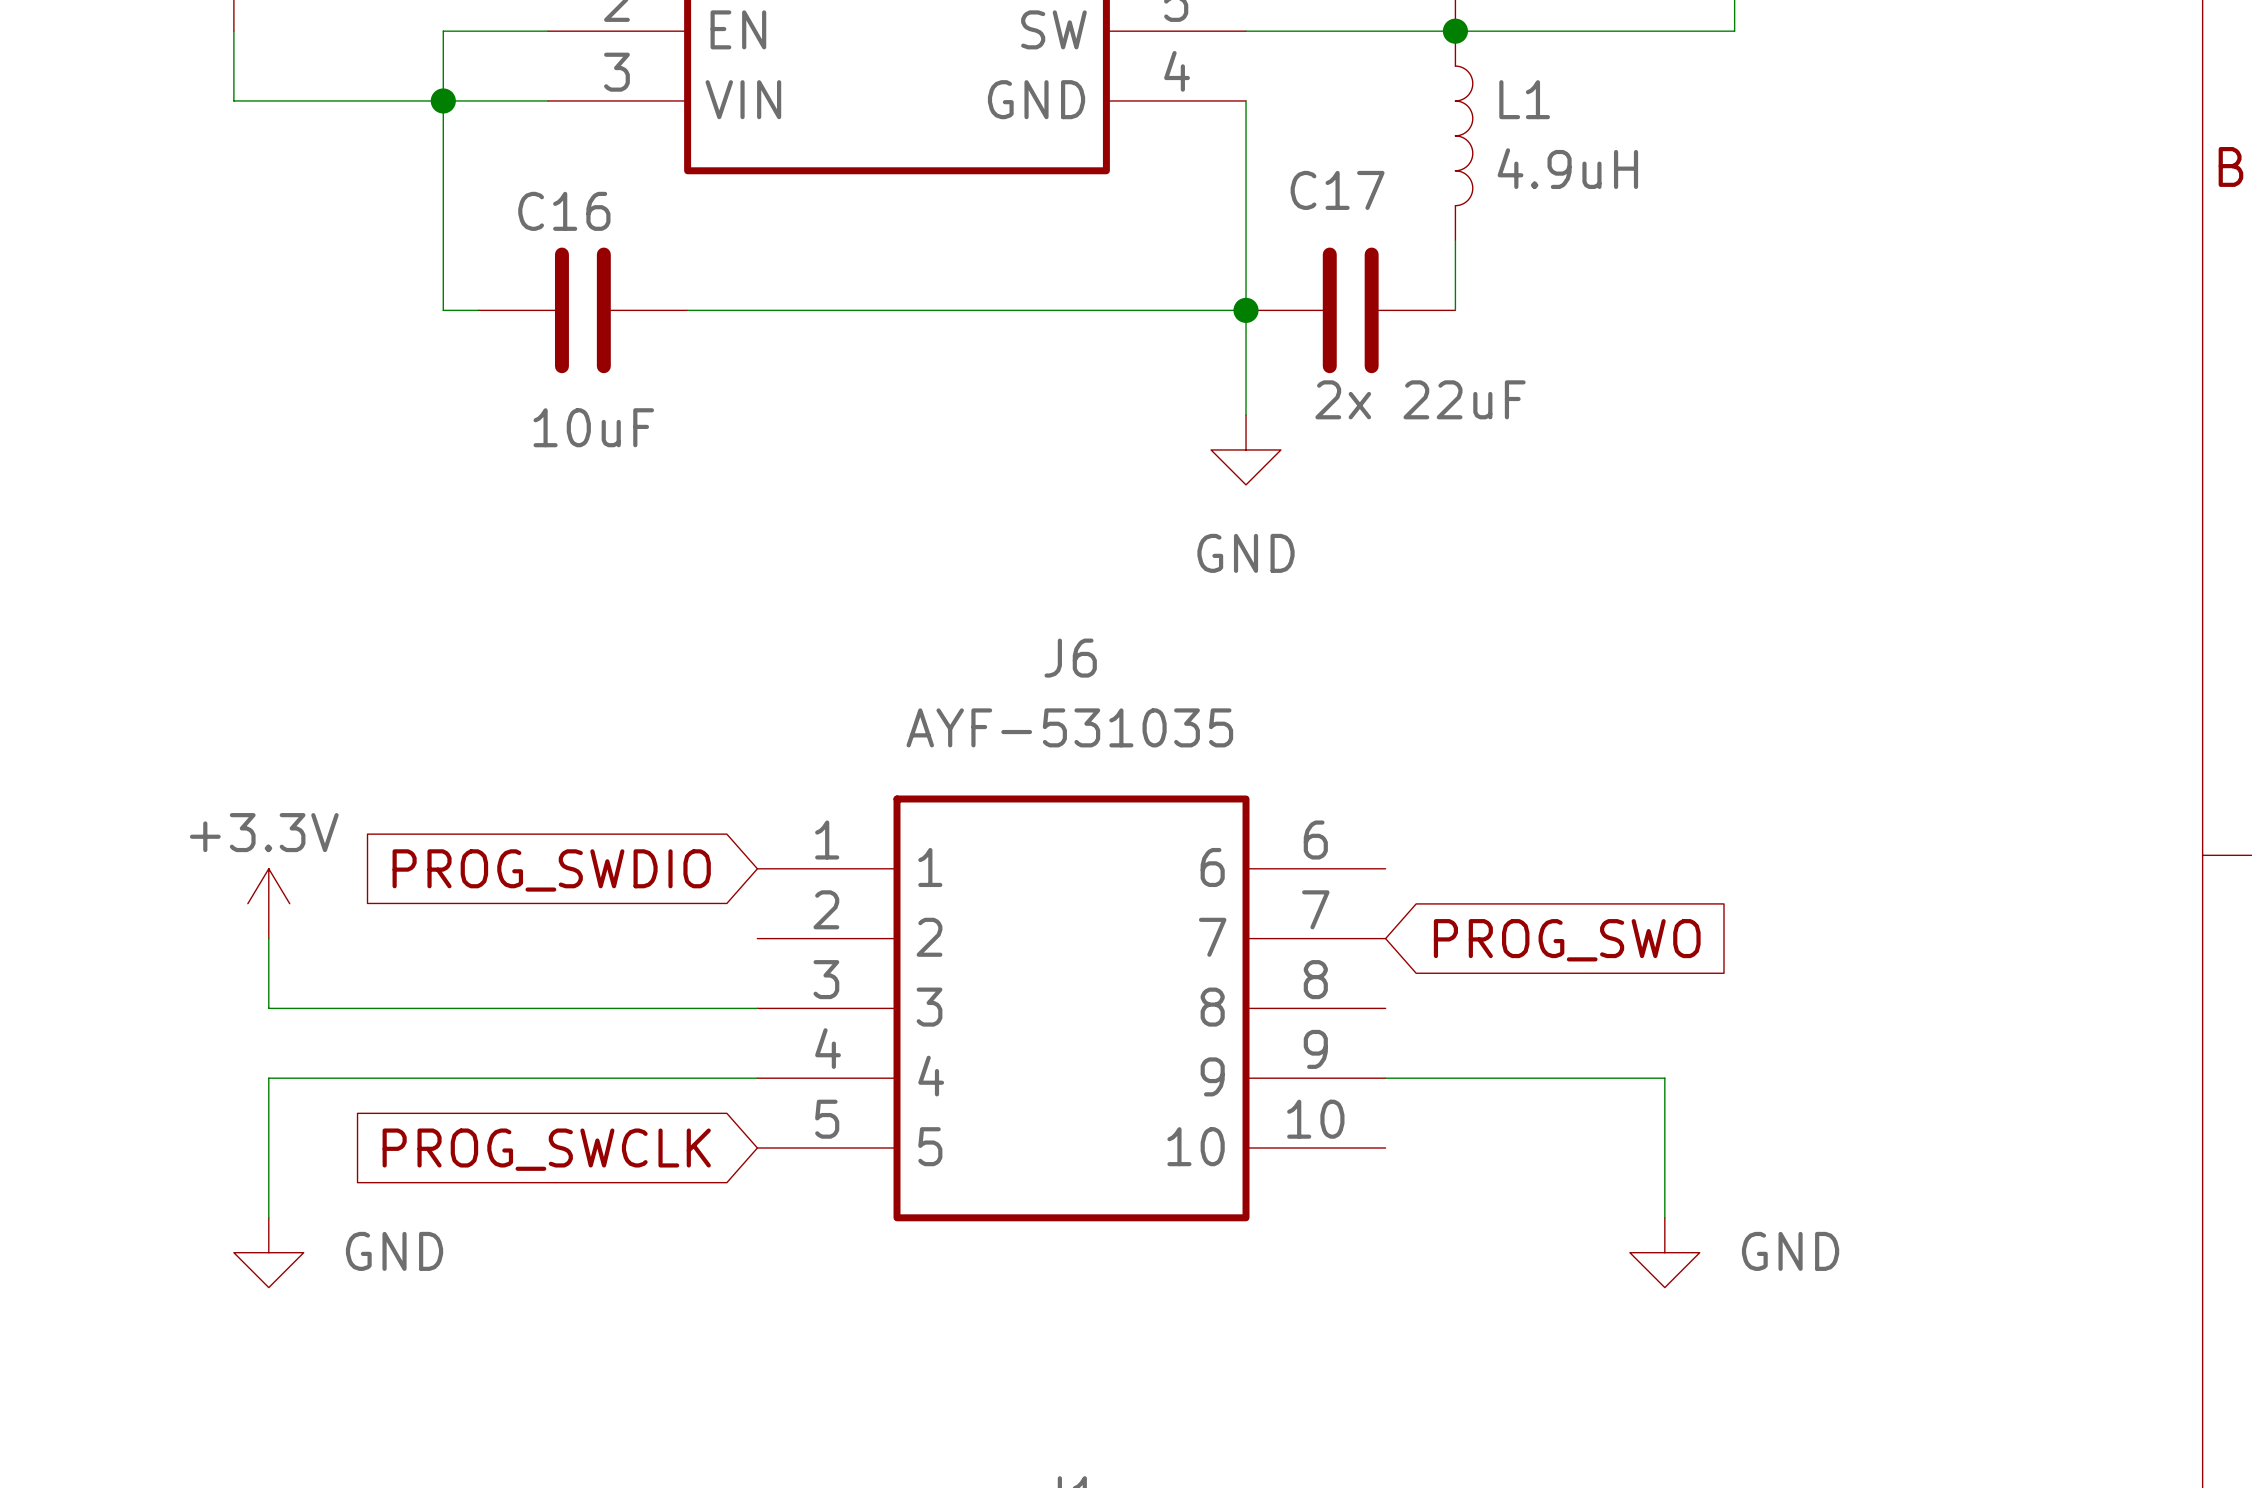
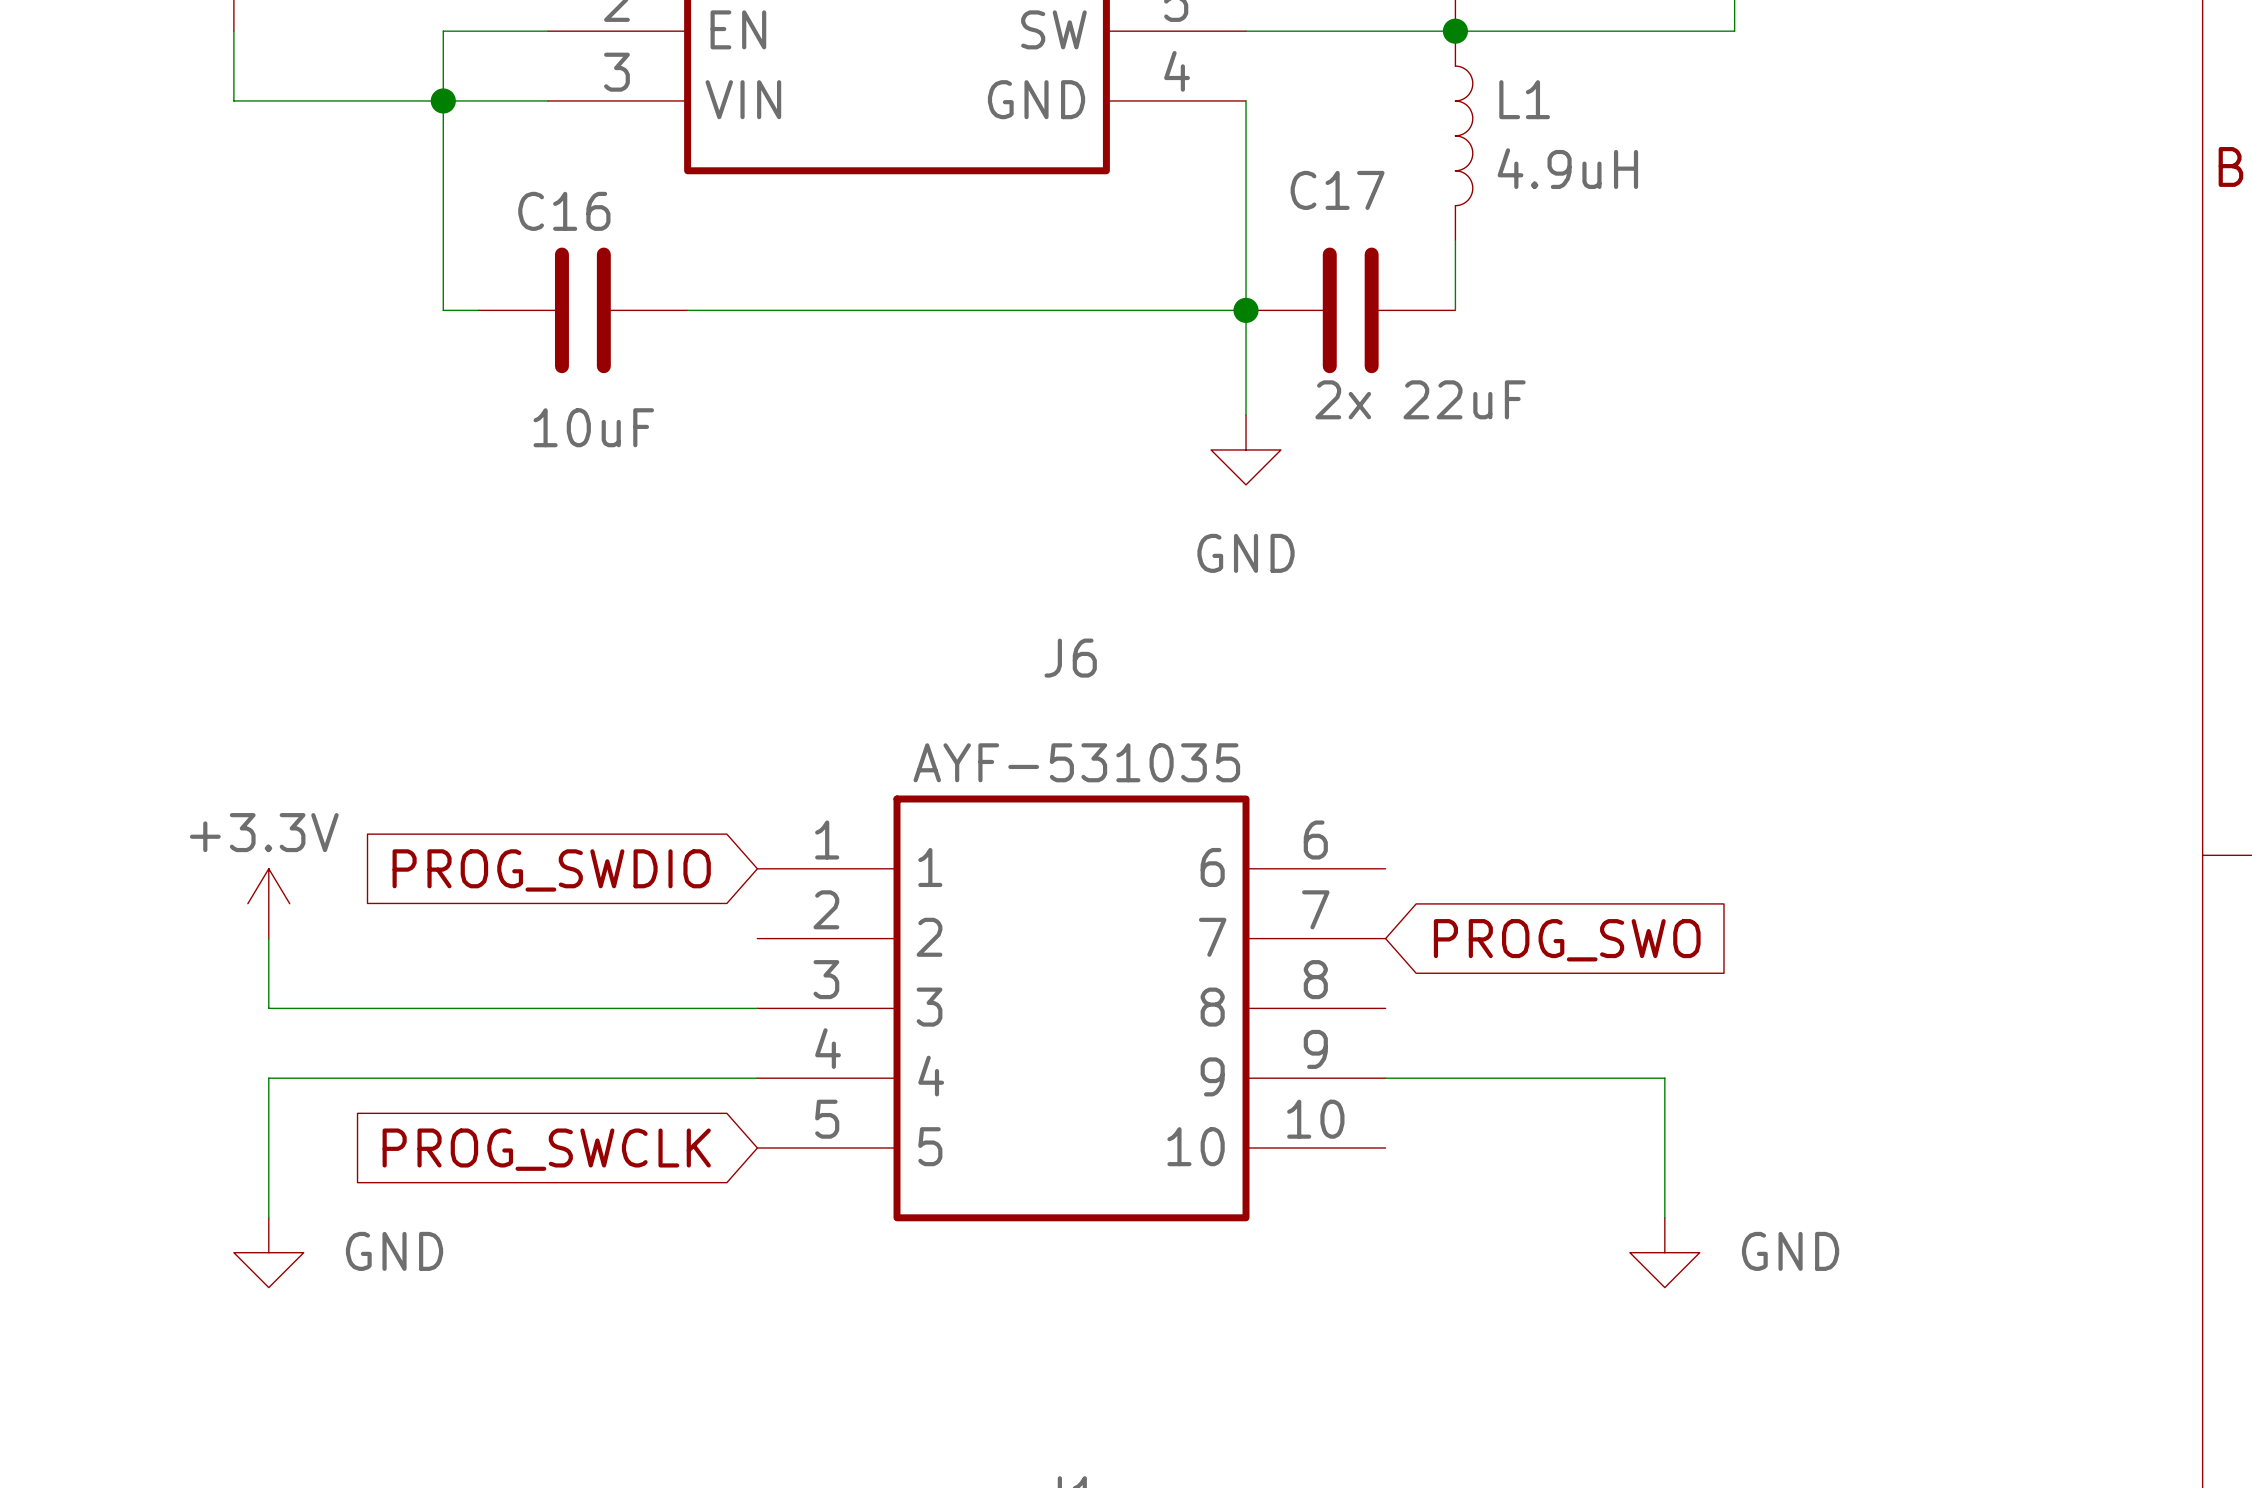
J6 value position: AYF-531035 (1069, 727) -> AYF-531035 (1076, 762)

